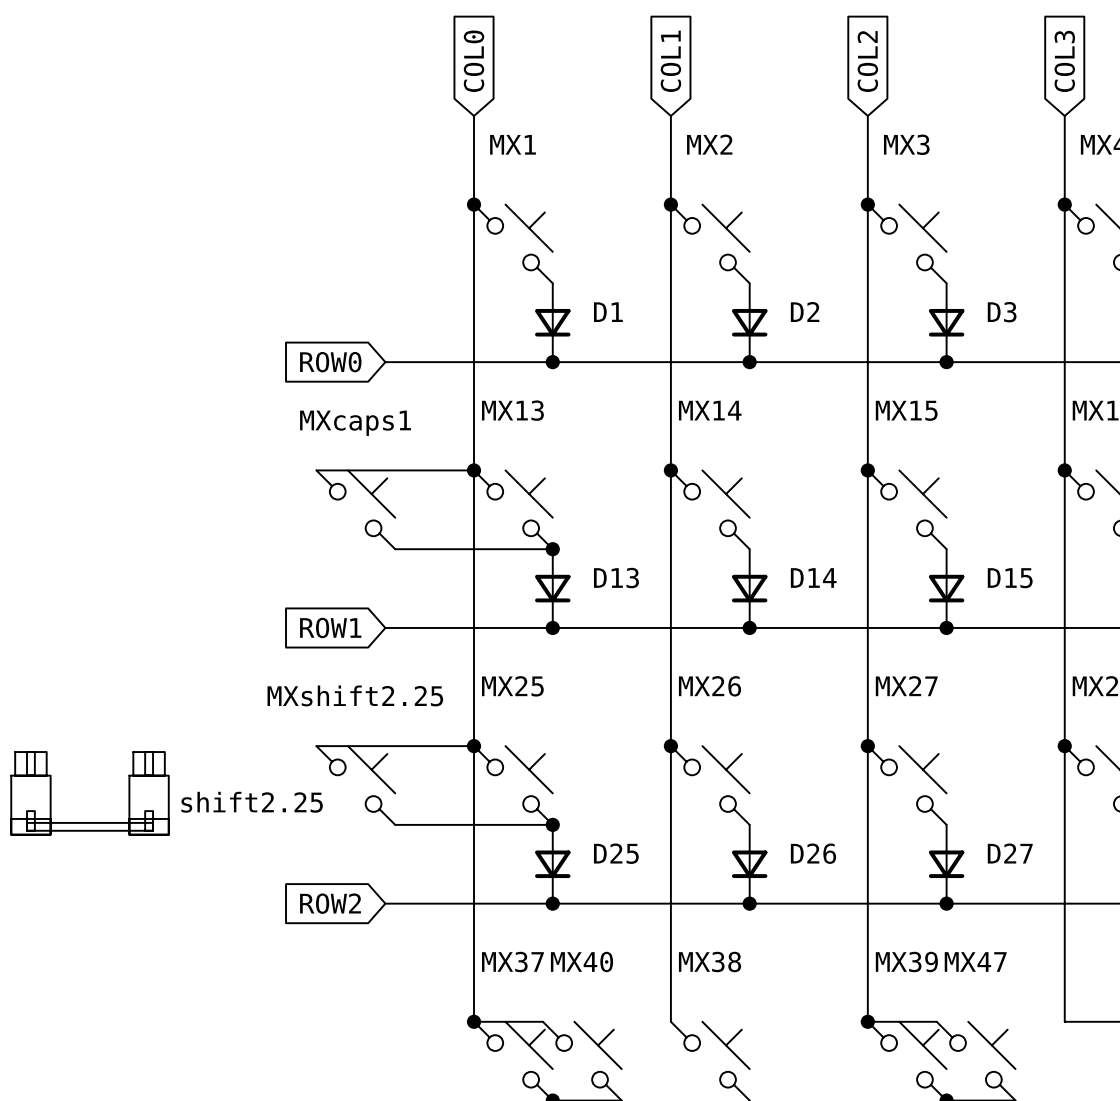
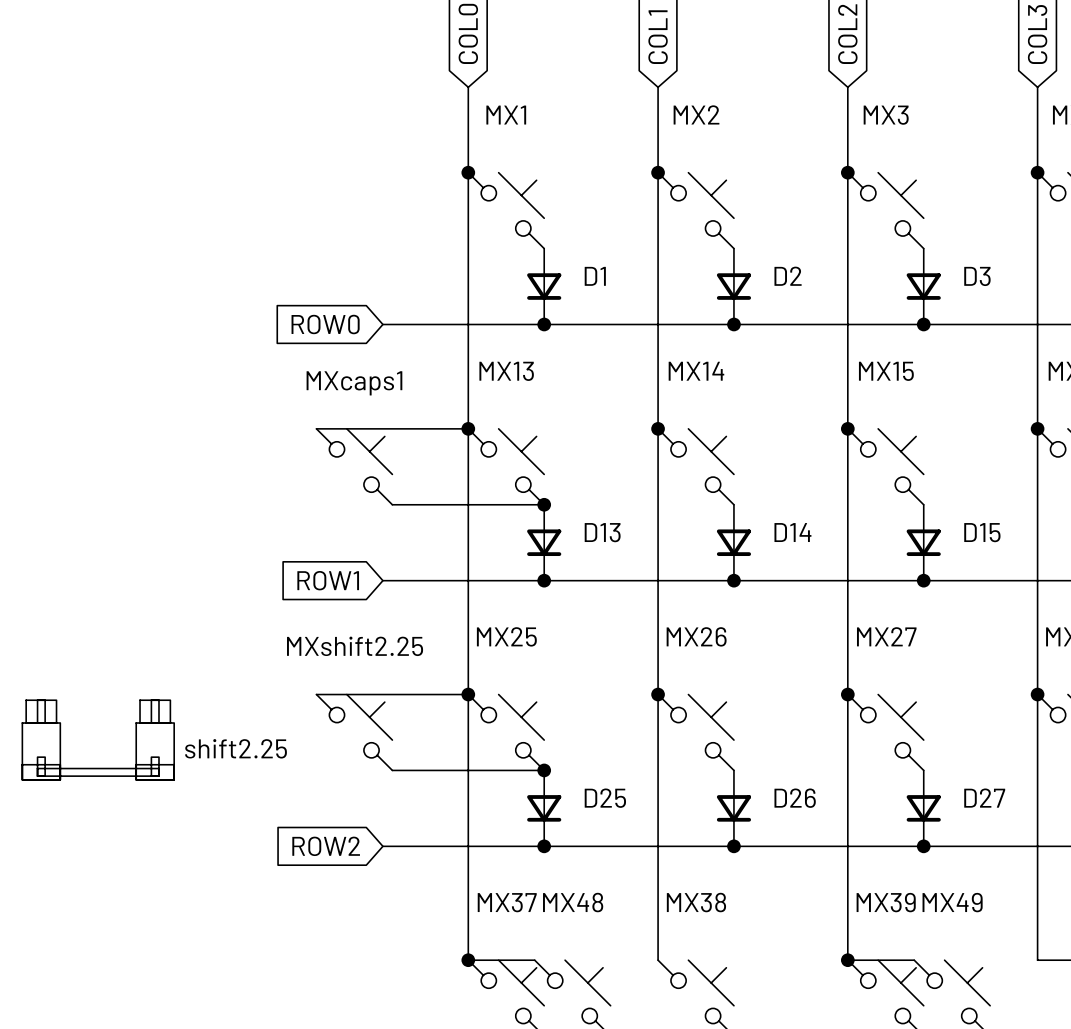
MX47 name: MX47 (975, 961) -> MX49 (952, 902)
MX40 name: MX40 (582, 962) -> MX48 (573, 902)

